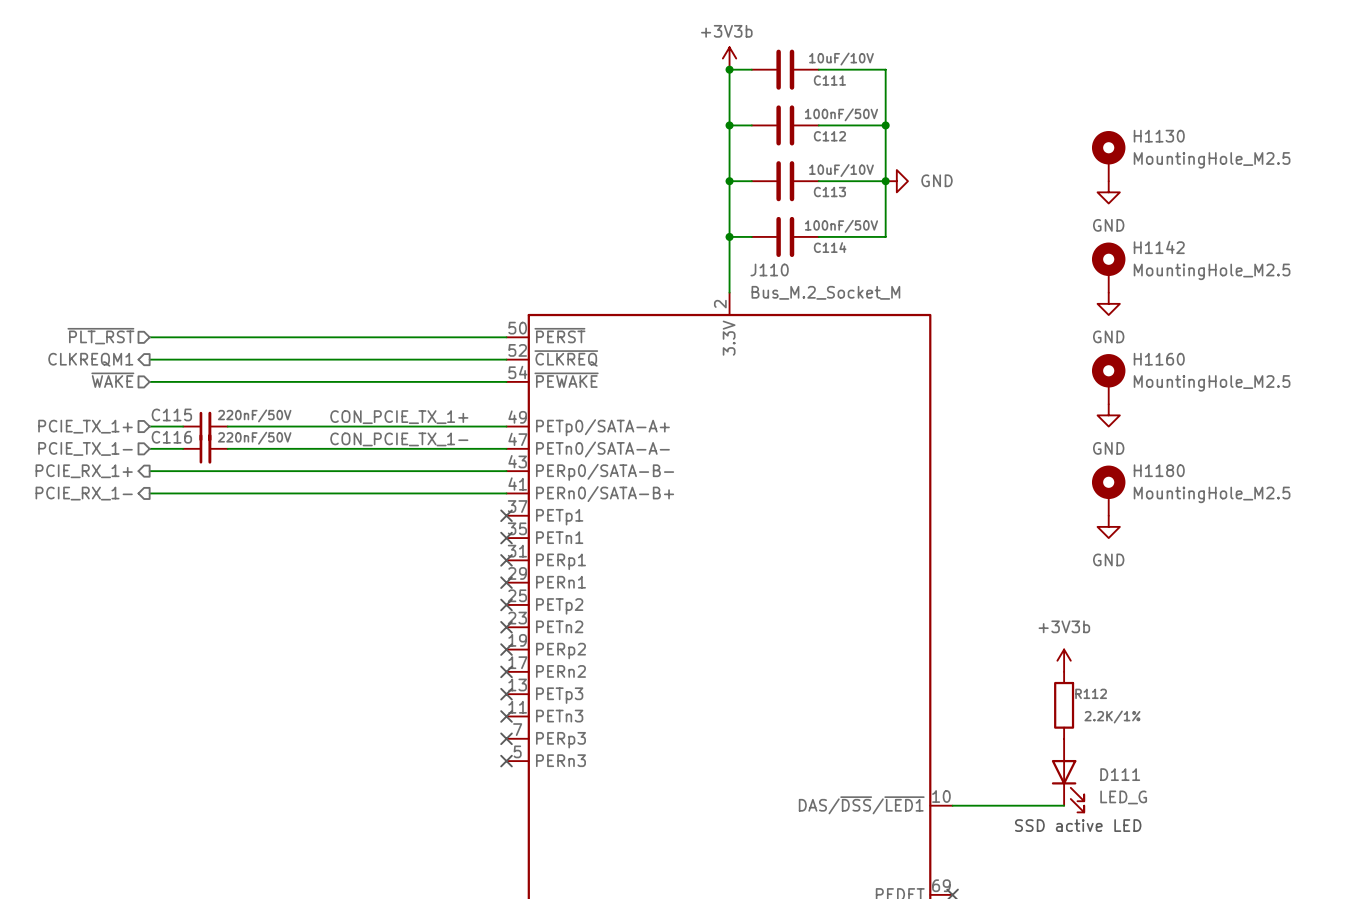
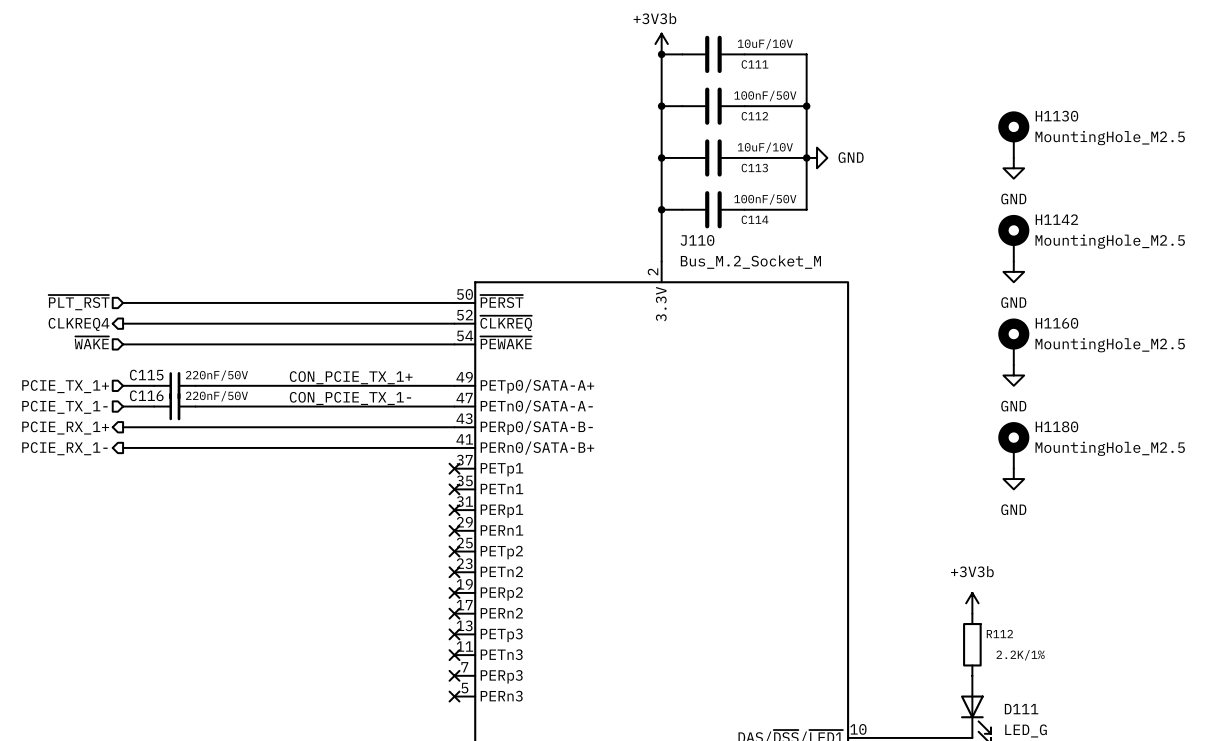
hierarchical label: CLKREQM1 (90, 359) -> CLKREQ4 (79, 324)

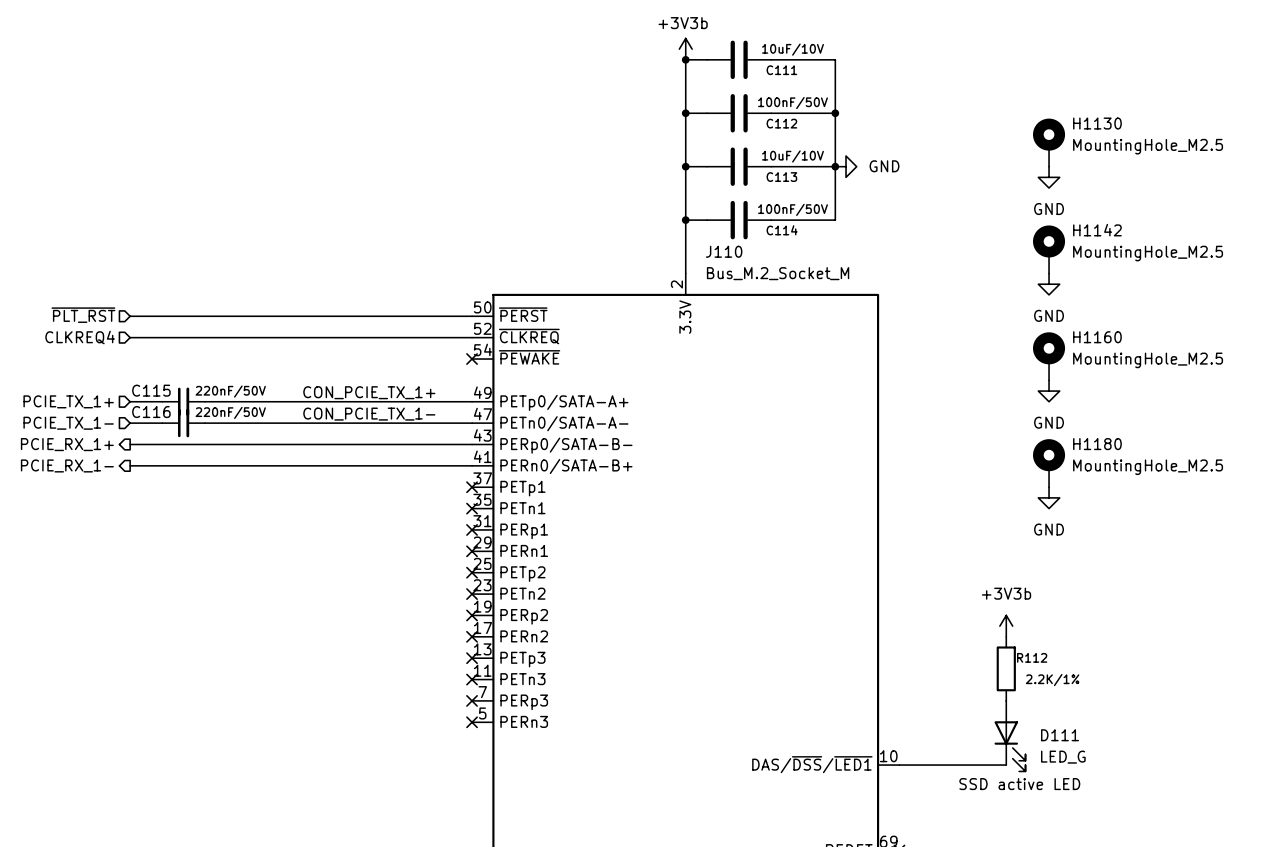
hierarchical label shape: output (79, 324) -> input (80, 337)
hierarchical label: ~{WAKE} (91, 342) -> none
wire: (123, 344) (454, 344) -> none
no-connect mark: none -> (472, 359)

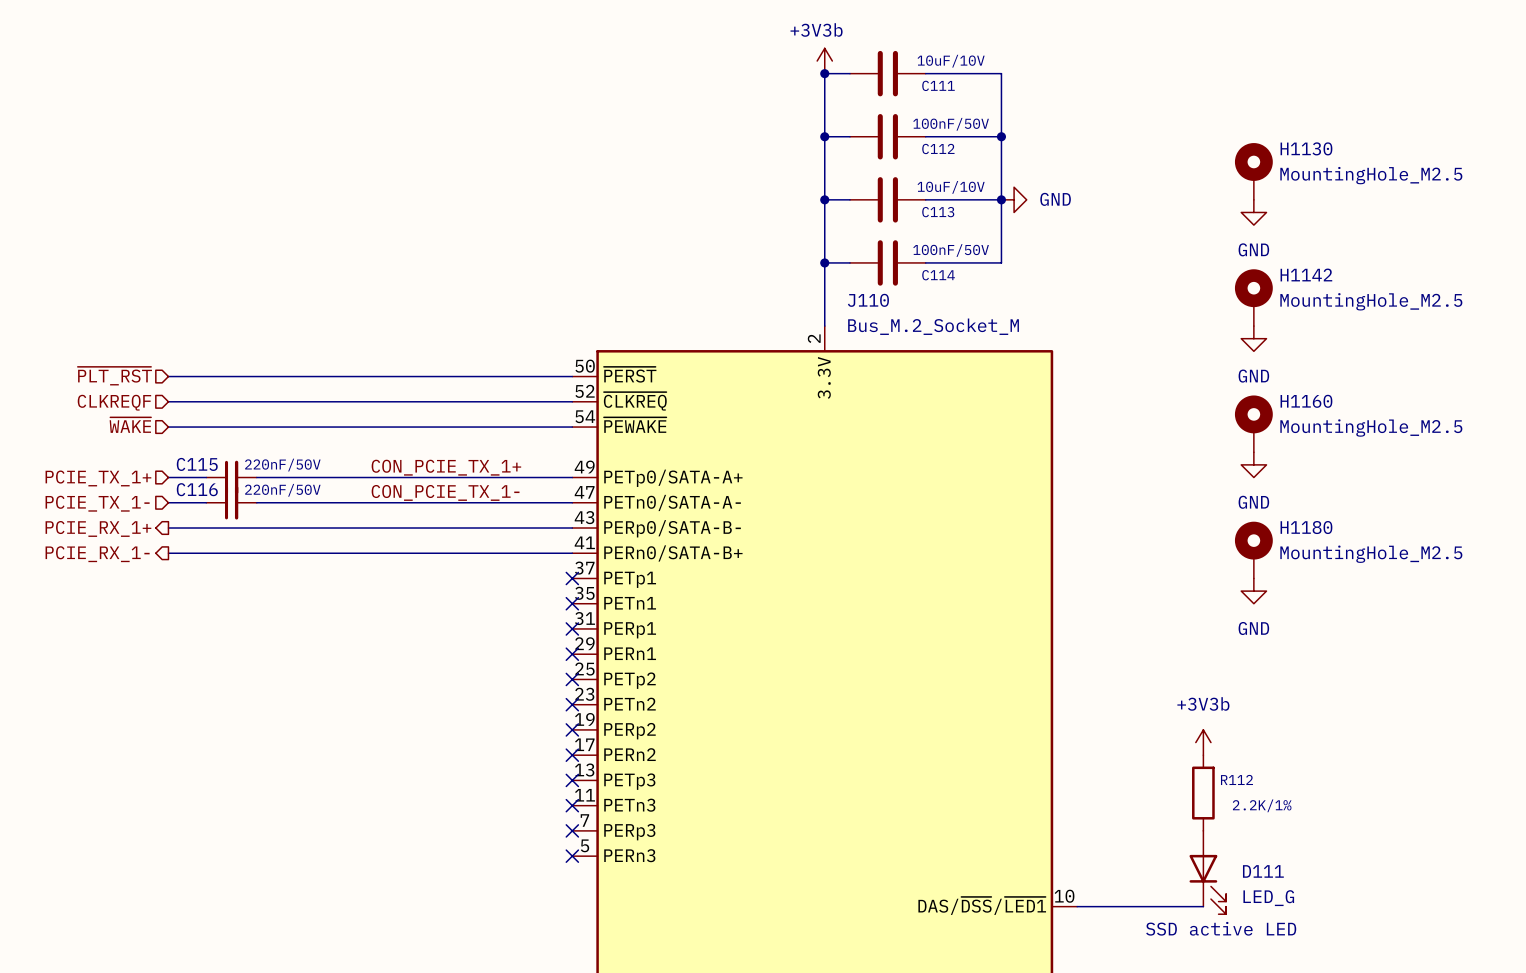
hierarchical label: CLKREQ4 (80, 337) -> CLKREQF (114, 402)
hierarchical label: none -> ~{WAKE} (130, 425)
wire: none -> (168, 427) (572, 427)
no-connect mark: (472, 359) -> none

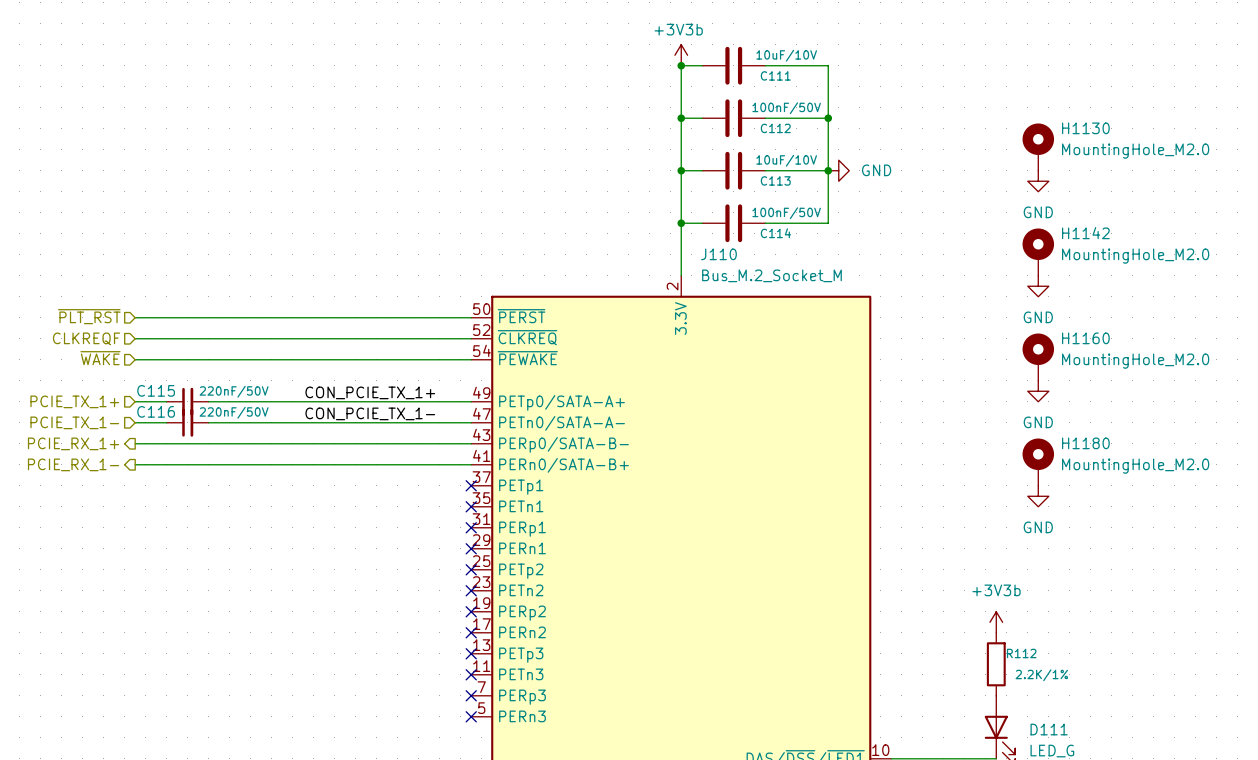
H1130 value: MountingHole_M2.5 (1371, 175) -> MountingHole_M2.0 (1135, 151)
H1142 value: MountingHole_M2.5 (1371, 301) -> MountingHole_M2.0 (1135, 256)
H1160 value: MountingHole_M2.5 (1371, 428) -> MountingHole_M2.0 (1135, 361)
H1180 value: MountingHole_M2.5 (1371, 554) -> MountingHole_M2.0 (1135, 466)

